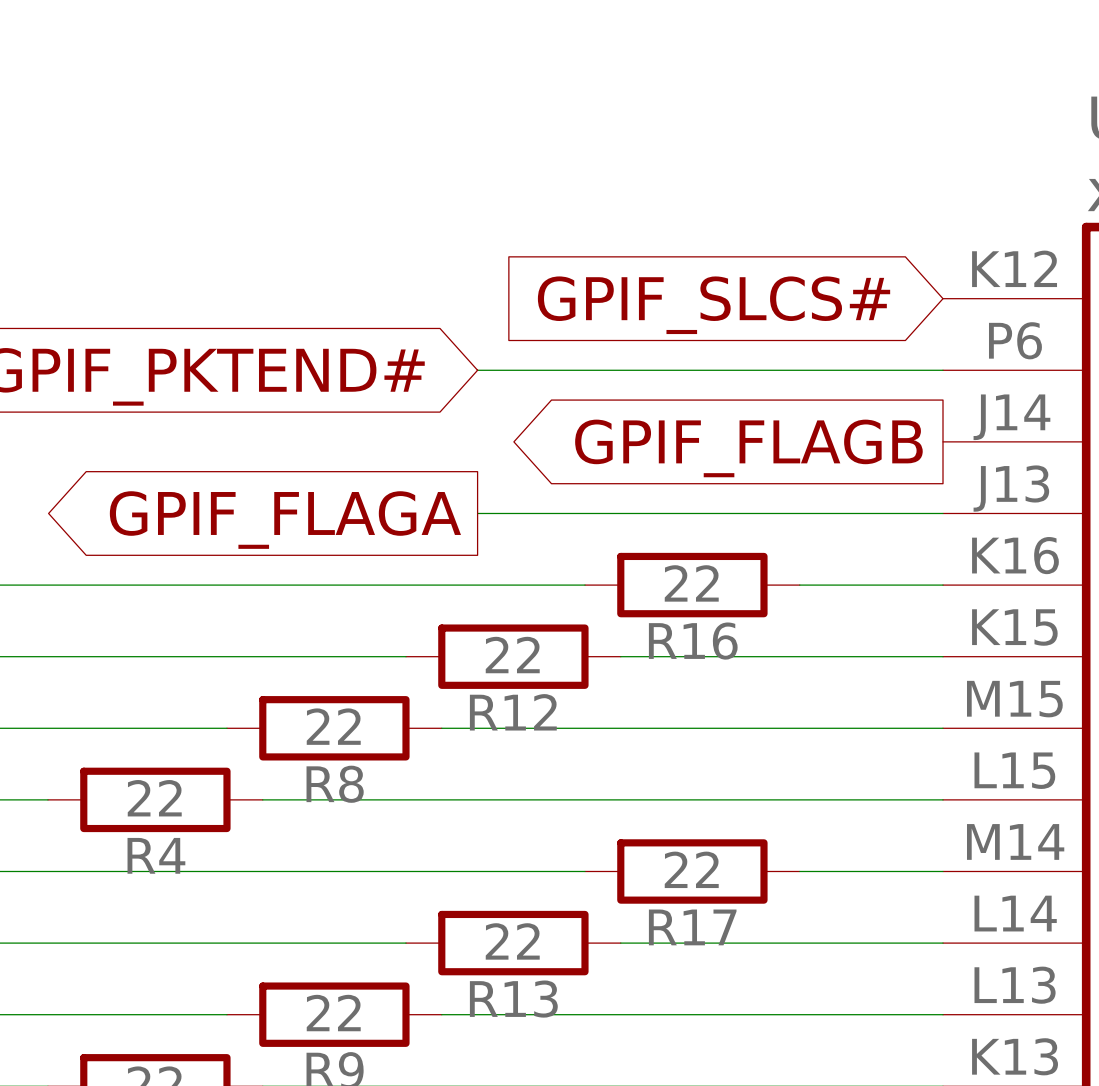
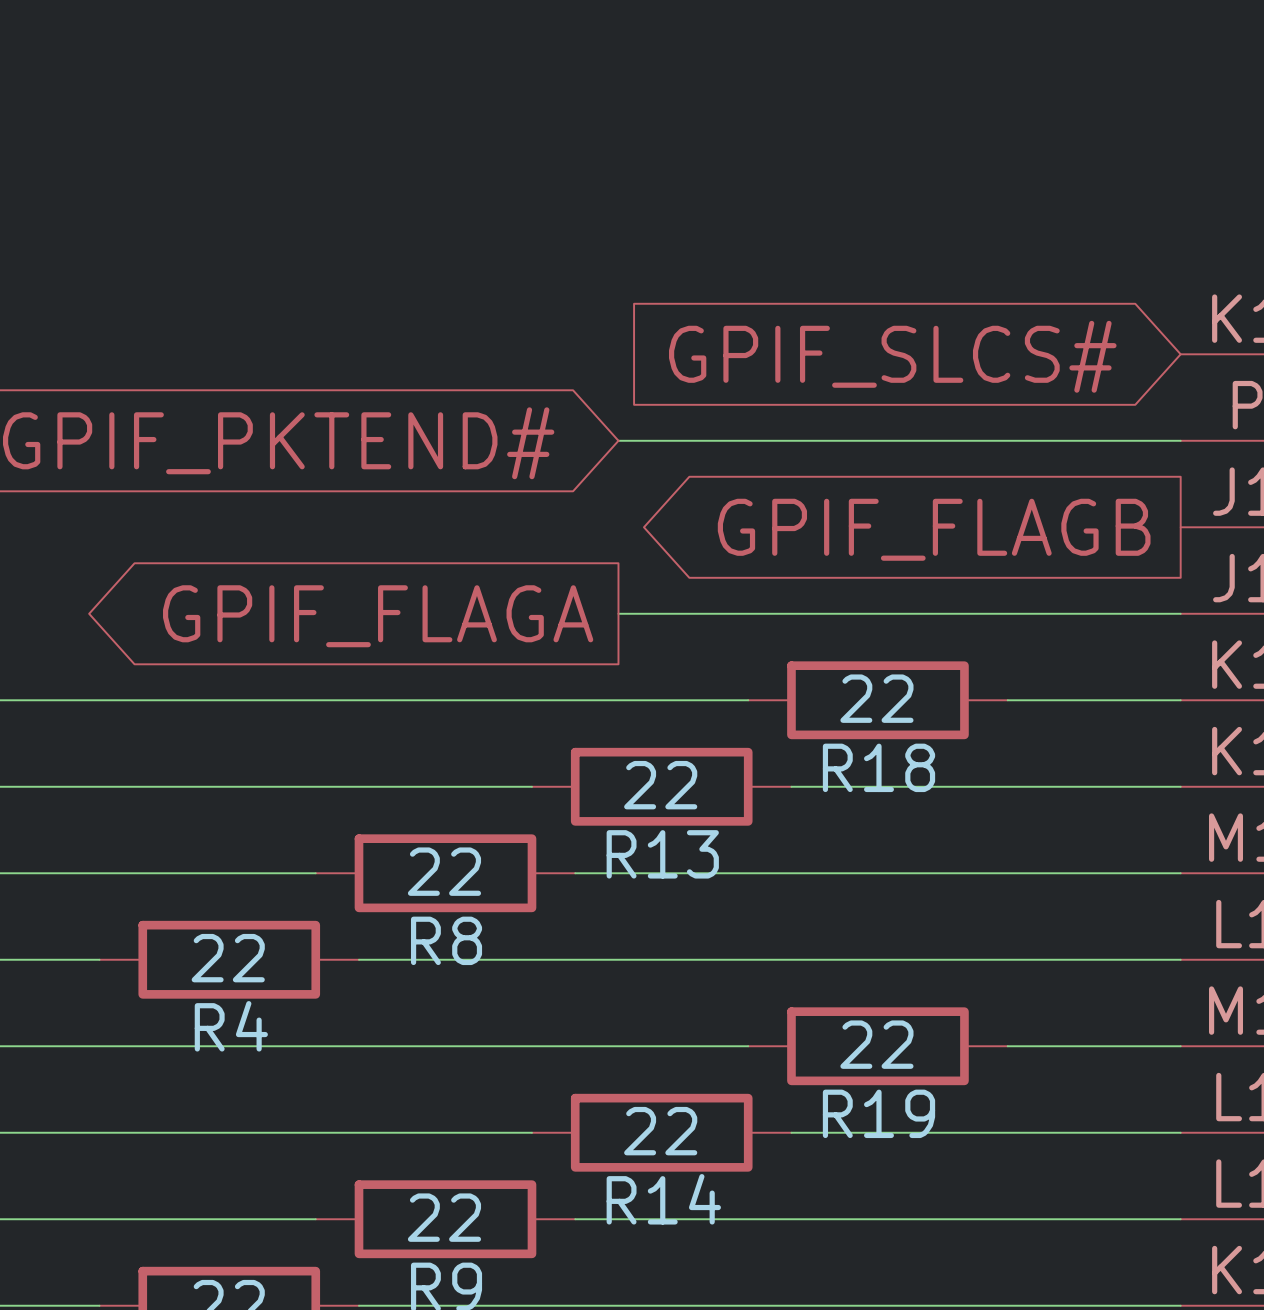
R16 name: R16 (693, 641) -> R18 (878, 767)
R12 name: R12 (513, 712) -> R13 (662, 854)
R17 name: R17 (692, 927) -> R19 (878, 1113)
R13 name: R13 (513, 999) -> R14 (663, 1199)

